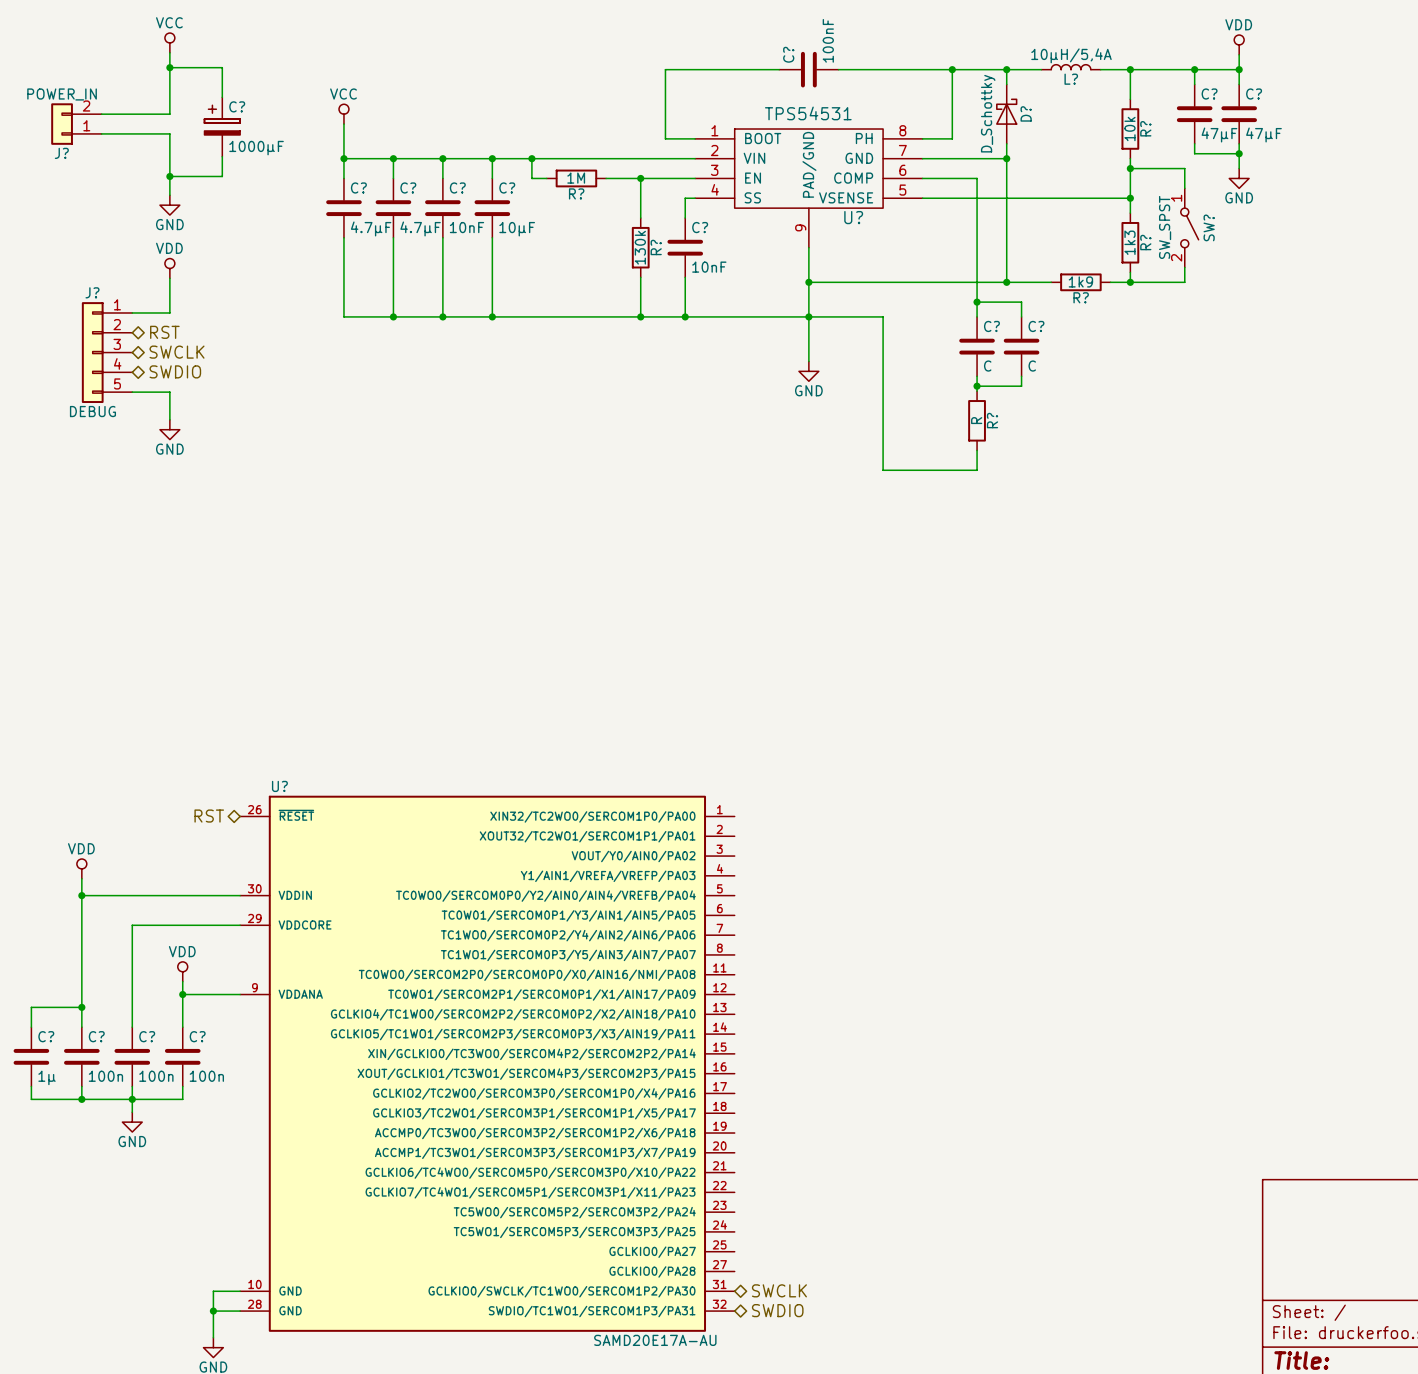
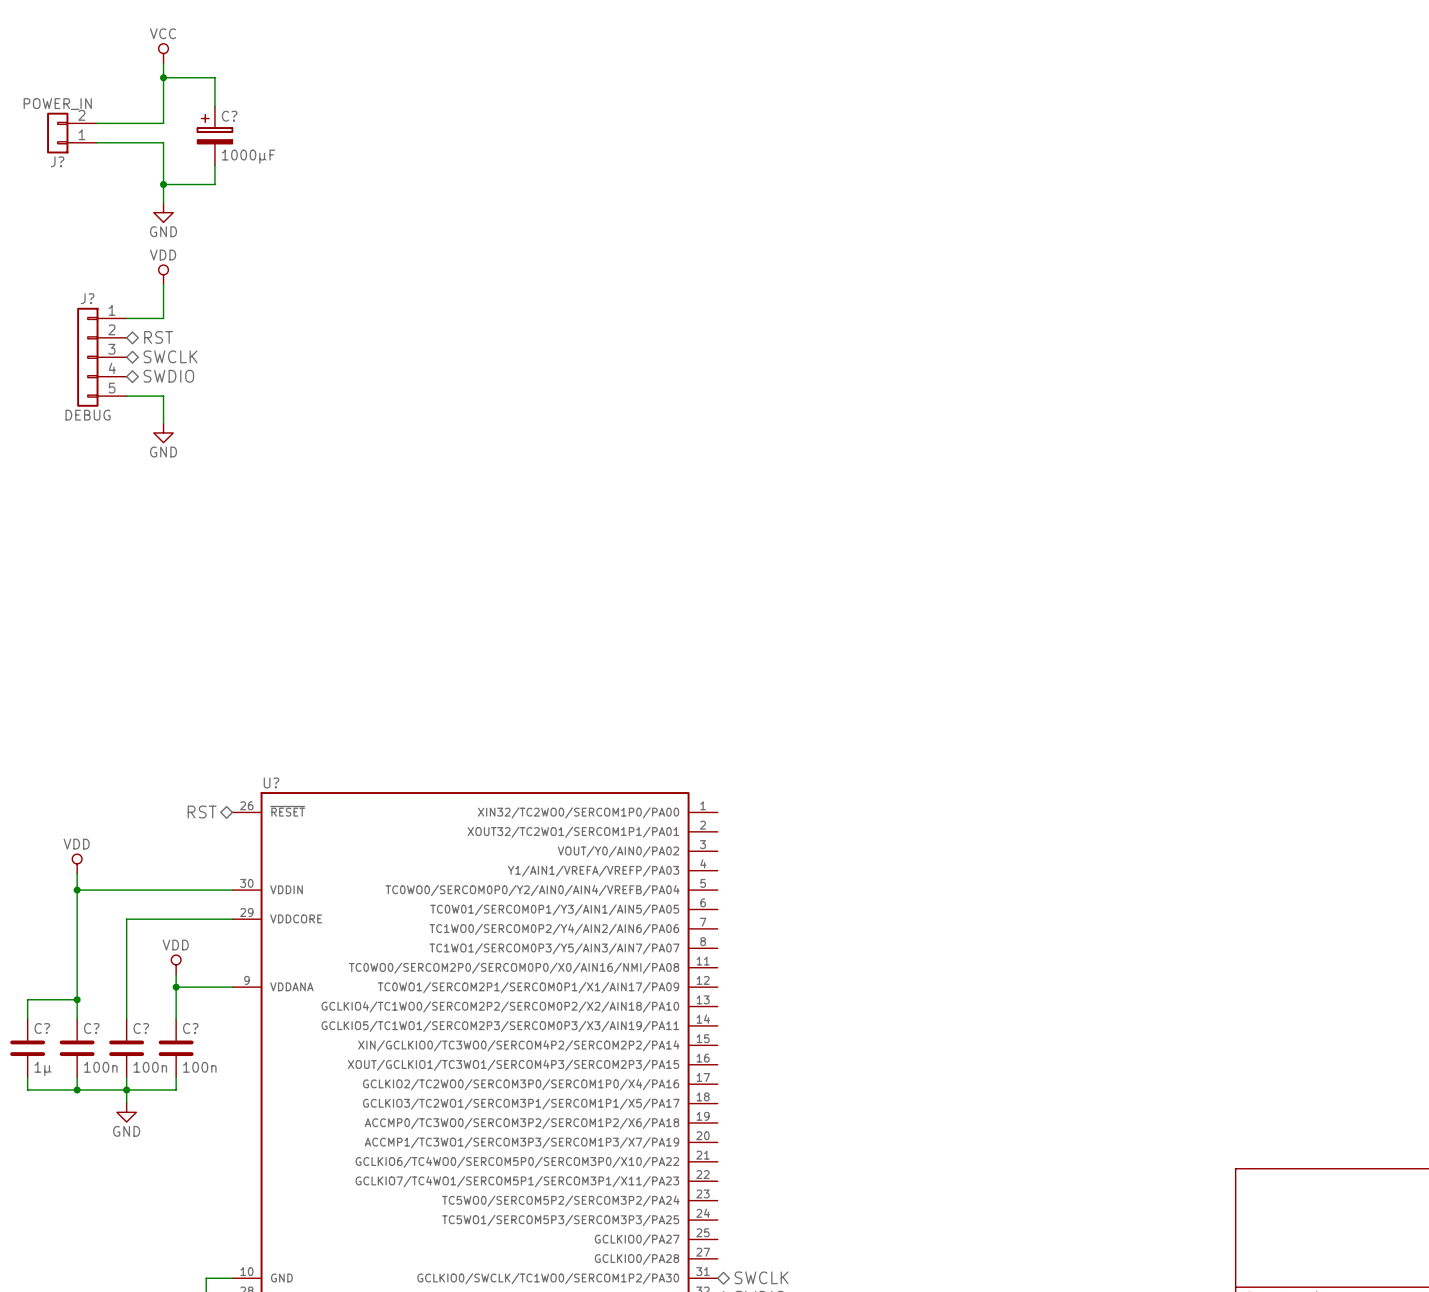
power symbol: VDD (1239, 44) -> none
wire: (1239, 54) (1239, 84) -> none
L?: 10µH/5,4A (1071, 67) -> none
wire: (779, 69) (665, 69) (665, 138) (695, 138) -> none
C?: 100nF (808, 69) -> none
wire: (838, 69) (1041, 69) -> none
wire: (952, 69) (952, 138) (922, 138) -> none
junction: (952, 69) -> none
wire: (1006, 69) (1006, 84) -> none
junction: (1006, 69) -> none
wire: (1100, 69) (1239, 69) -> none
wire: (1130, 69) (1130, 99) -> none
junction: (1130, 69) -> none
wire: (1194, 69) (1194, 84) -> none
junction: (1194, 69) -> none
junction: (1239, 69) -> none
power symbol: VCC (343, 114) -> none
D?: D_Schottky (1006, 114) -> none
C?: 47µF (1194, 114) -> none
C?: 47µF (1239, 114) -> none
wire: (343, 124) (343, 178) -> none
R?: 10k (1130, 129) -> none
wire: (1006, 143) (1006, 282) -> none
wire: (1194, 143) (1194, 153) (1239, 153) -> none
wire: (1239, 143) (1239, 168) -> none
junction: (1239, 153) -> none
wire: (343, 158) (695, 158) -> none
junction: (343, 158) -> none
wire: (393, 158) (393, 178) -> none
junction: (393, 158) -> none
wire: (442, 158) (442, 178) -> none
junction: (442, 158) -> none
wire: (492, 158) (492, 178) -> none
junction: (492, 158) -> none
wire: (531, 158) (531, 178) (546, 178) -> none
junction: (531, 158) -> none
wire: (922, 158) (1006, 158) -> none
junction: (1006, 158) -> none
wire: (1130, 158) (1130, 213) -> none
wire: (1130, 168) (1184, 168) (1184, 188) -> none
junction: (1130, 168) -> none
R?: 1M (576, 178) -> none
wire: (606, 178) (695, 178) -> none
wire: (640, 178) (640, 218) -> none
junction: (640, 178) -> none
wire: (922, 178) (977, 178) (977, 316) -> none
power symbol: GND (1239, 178) -> none
U?: TPS54531 (808, 188) -> none
wire: (695, 198) (685, 198) (685, 218) -> none
wire: (922, 198) (1130, 198) -> none
junction: (1130, 198) -> none
C?: 4.7µF (343, 208) -> none
C?: 4.7µF (393, 208) -> none
C?: 10nF (442, 208) -> none
C?: 10µF (492, 208) -> none
SW?: SW_SPST (1189, 227) -> none
wire: (343, 237) (343, 316) (883, 316) (883, 470) (977, 470) (977, 450) -> none
wire: (393, 237) (393, 316) -> none
wire: (442, 237) (442, 316) -> none
wire: (492, 237) (492, 316) -> none
R?: 1k3 (1130, 242) -> none
R?: 130k (640, 247) -> none
C?: 10nF (685, 247) -> none
wire: (808, 247) (808, 361) -> none
wire: (1184, 267) (1184, 282) (1110, 282) -> none
wire: (1130, 272) (1130, 282) -> none
wire: (640, 277) (640, 316) -> none
wire: (685, 277) (685, 316) -> none
wire: (808, 282) (1051, 282) -> none
junction: (808, 282) -> none
junction: (1006, 282) -> none
R?: 1k9 (1080, 282) -> none
junction: (1130, 282) -> none
wire: (977, 302) (1021, 302) (1021, 316) -> none
junction: (977, 302) -> none
junction: (393, 316) -> none
junction: (442, 316) -> none
junction: (492, 316) -> none
junction: (640, 316) -> none
junction: (685, 316) -> none
junction: (808, 316) -> none
C?: C (977, 346) -> none
C?: C (1021, 346) -> none
power symbol: GND (808, 371) -> none
wire: (977, 376) (977, 391) -> none
wire: (1021, 376) (1021, 386) (977, 386) -> none
junction: (977, 386) -> none
R?: R (977, 420) -> none

